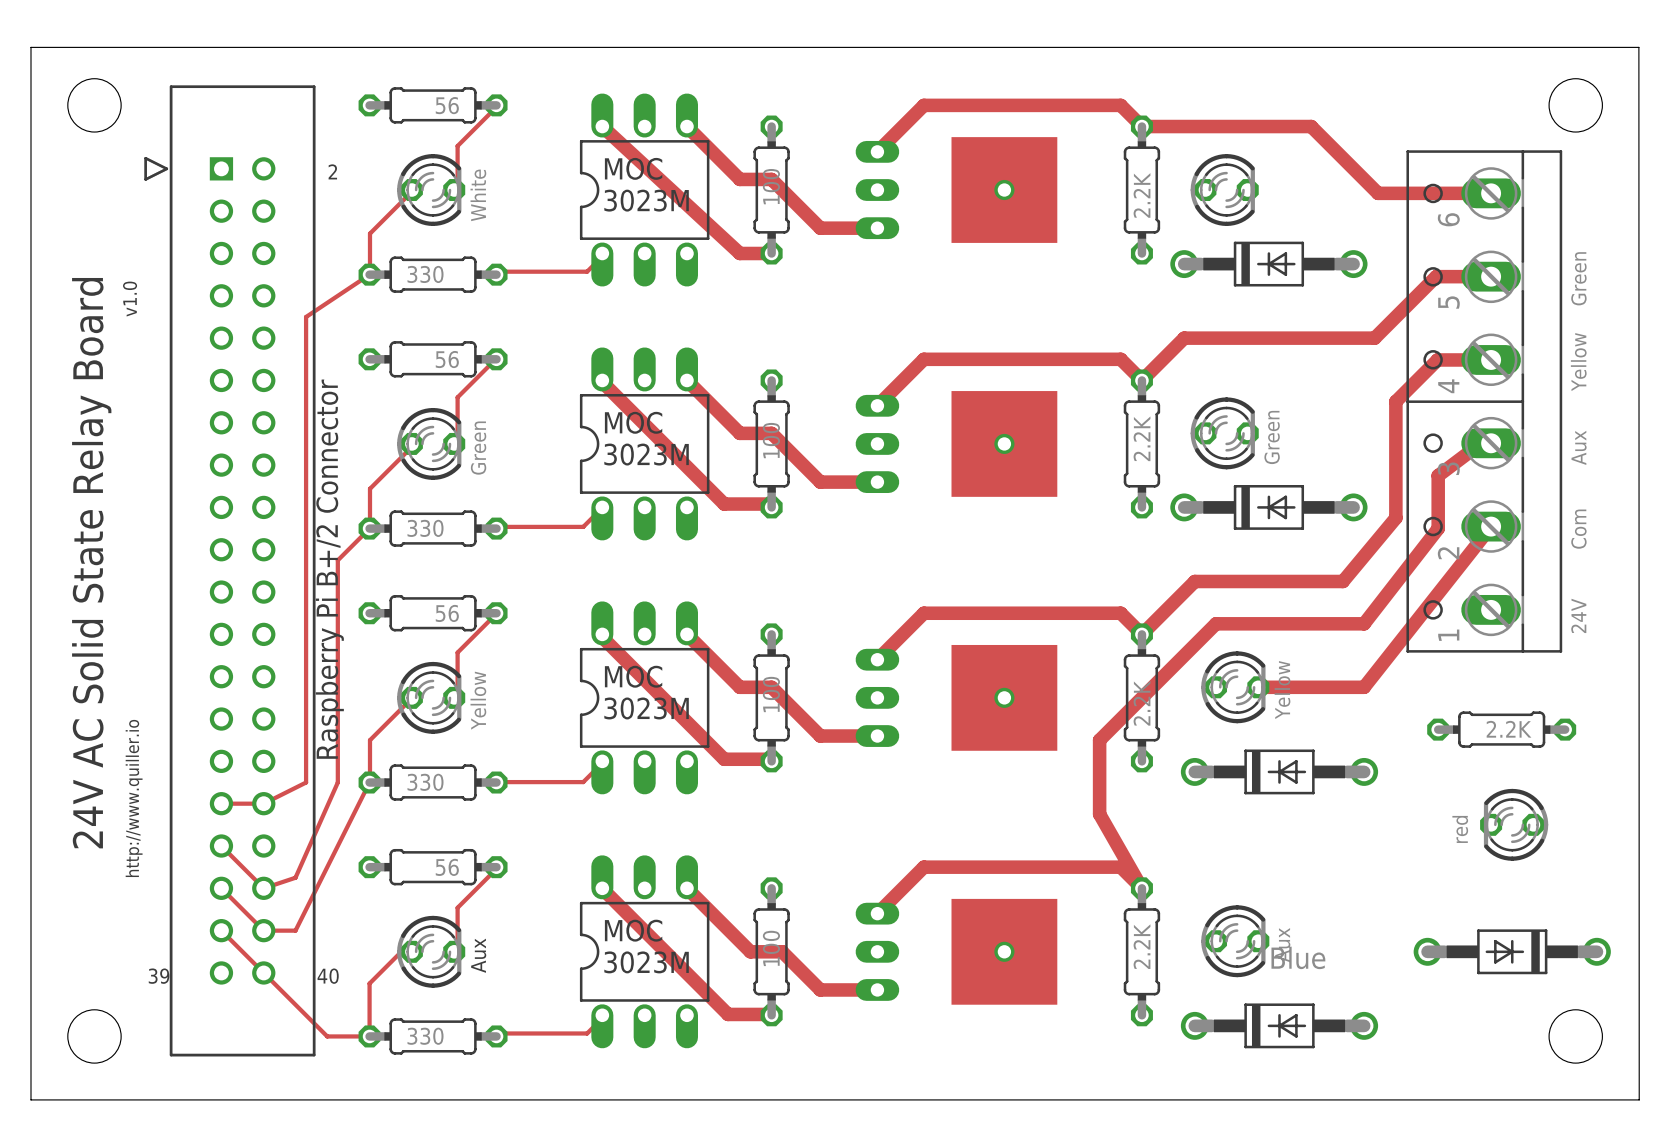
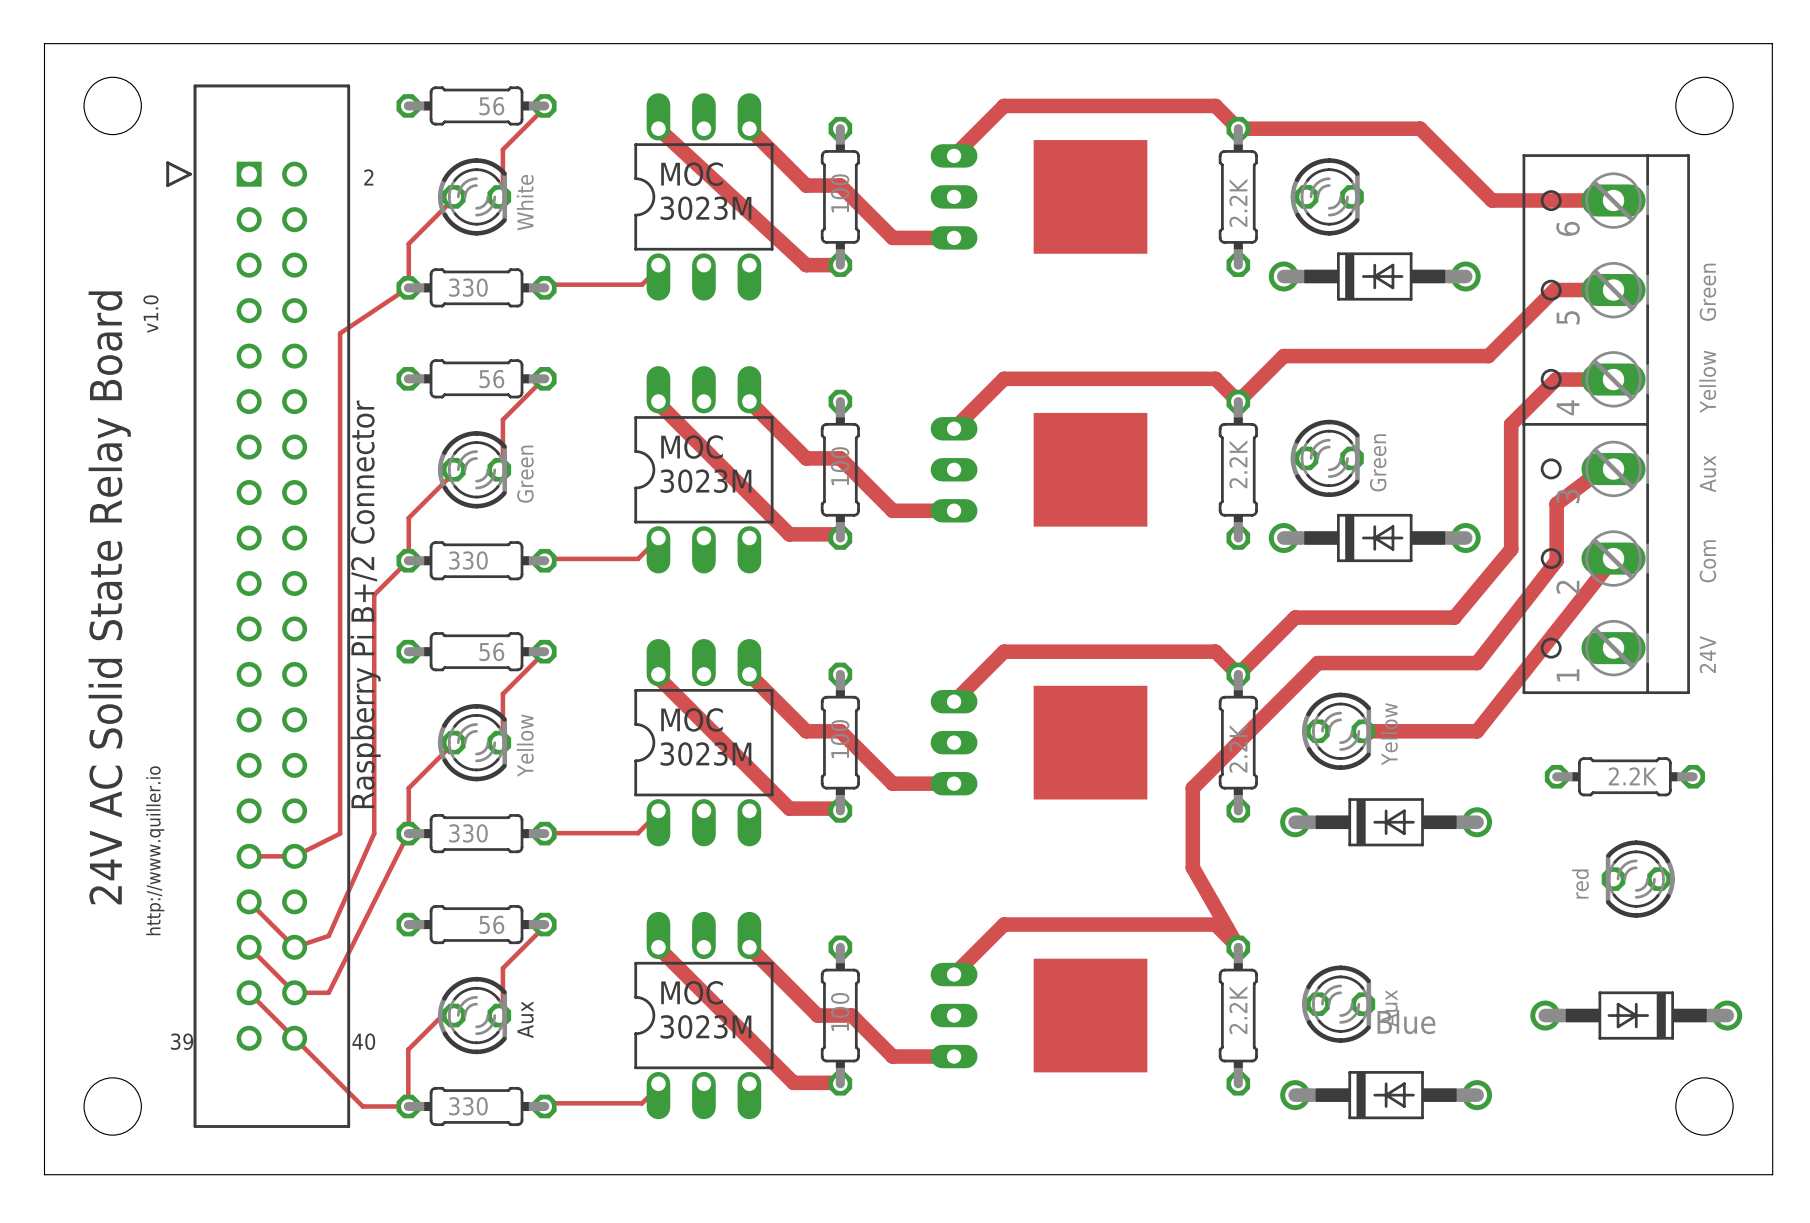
via: (1004, 190) -> none
via: (1004, 443) -> none
via: (1004, 697) -> none
via: (1004, 951) -> none

